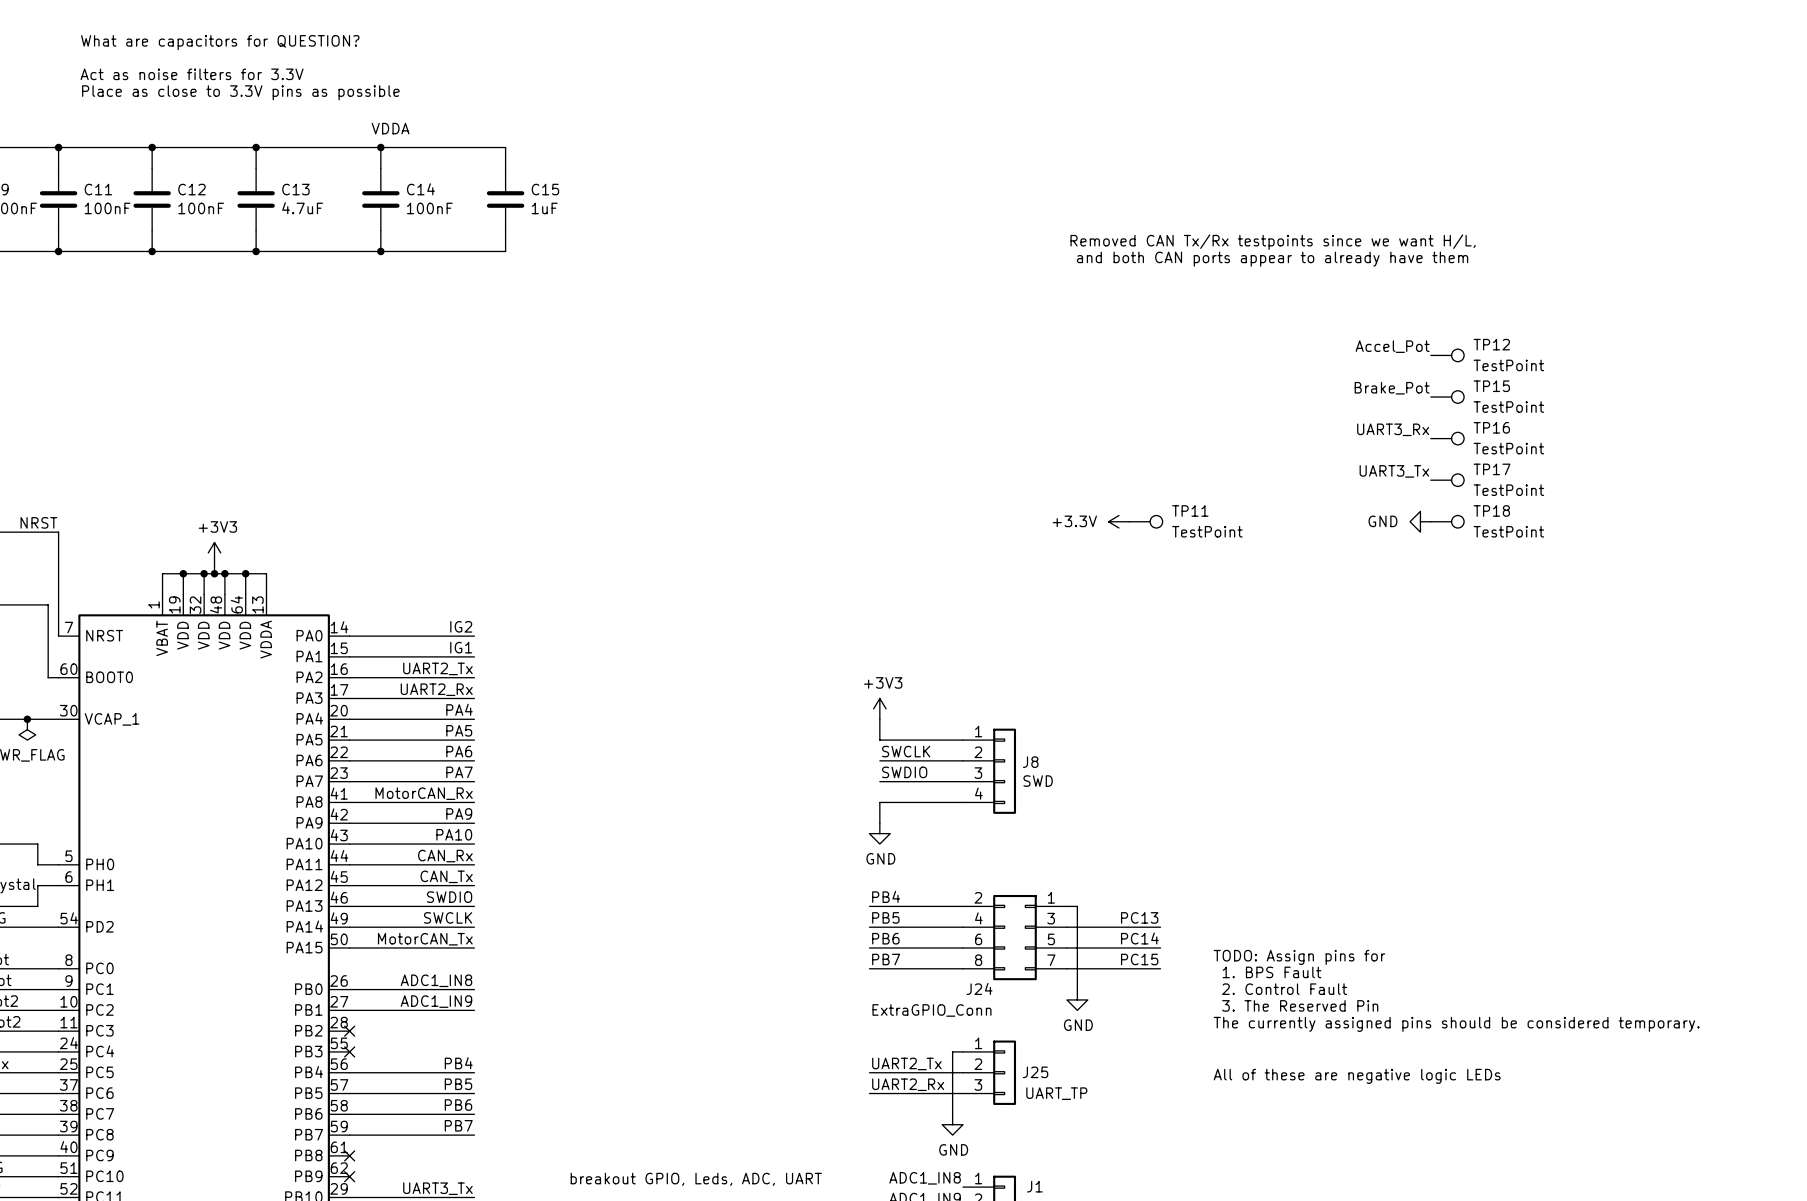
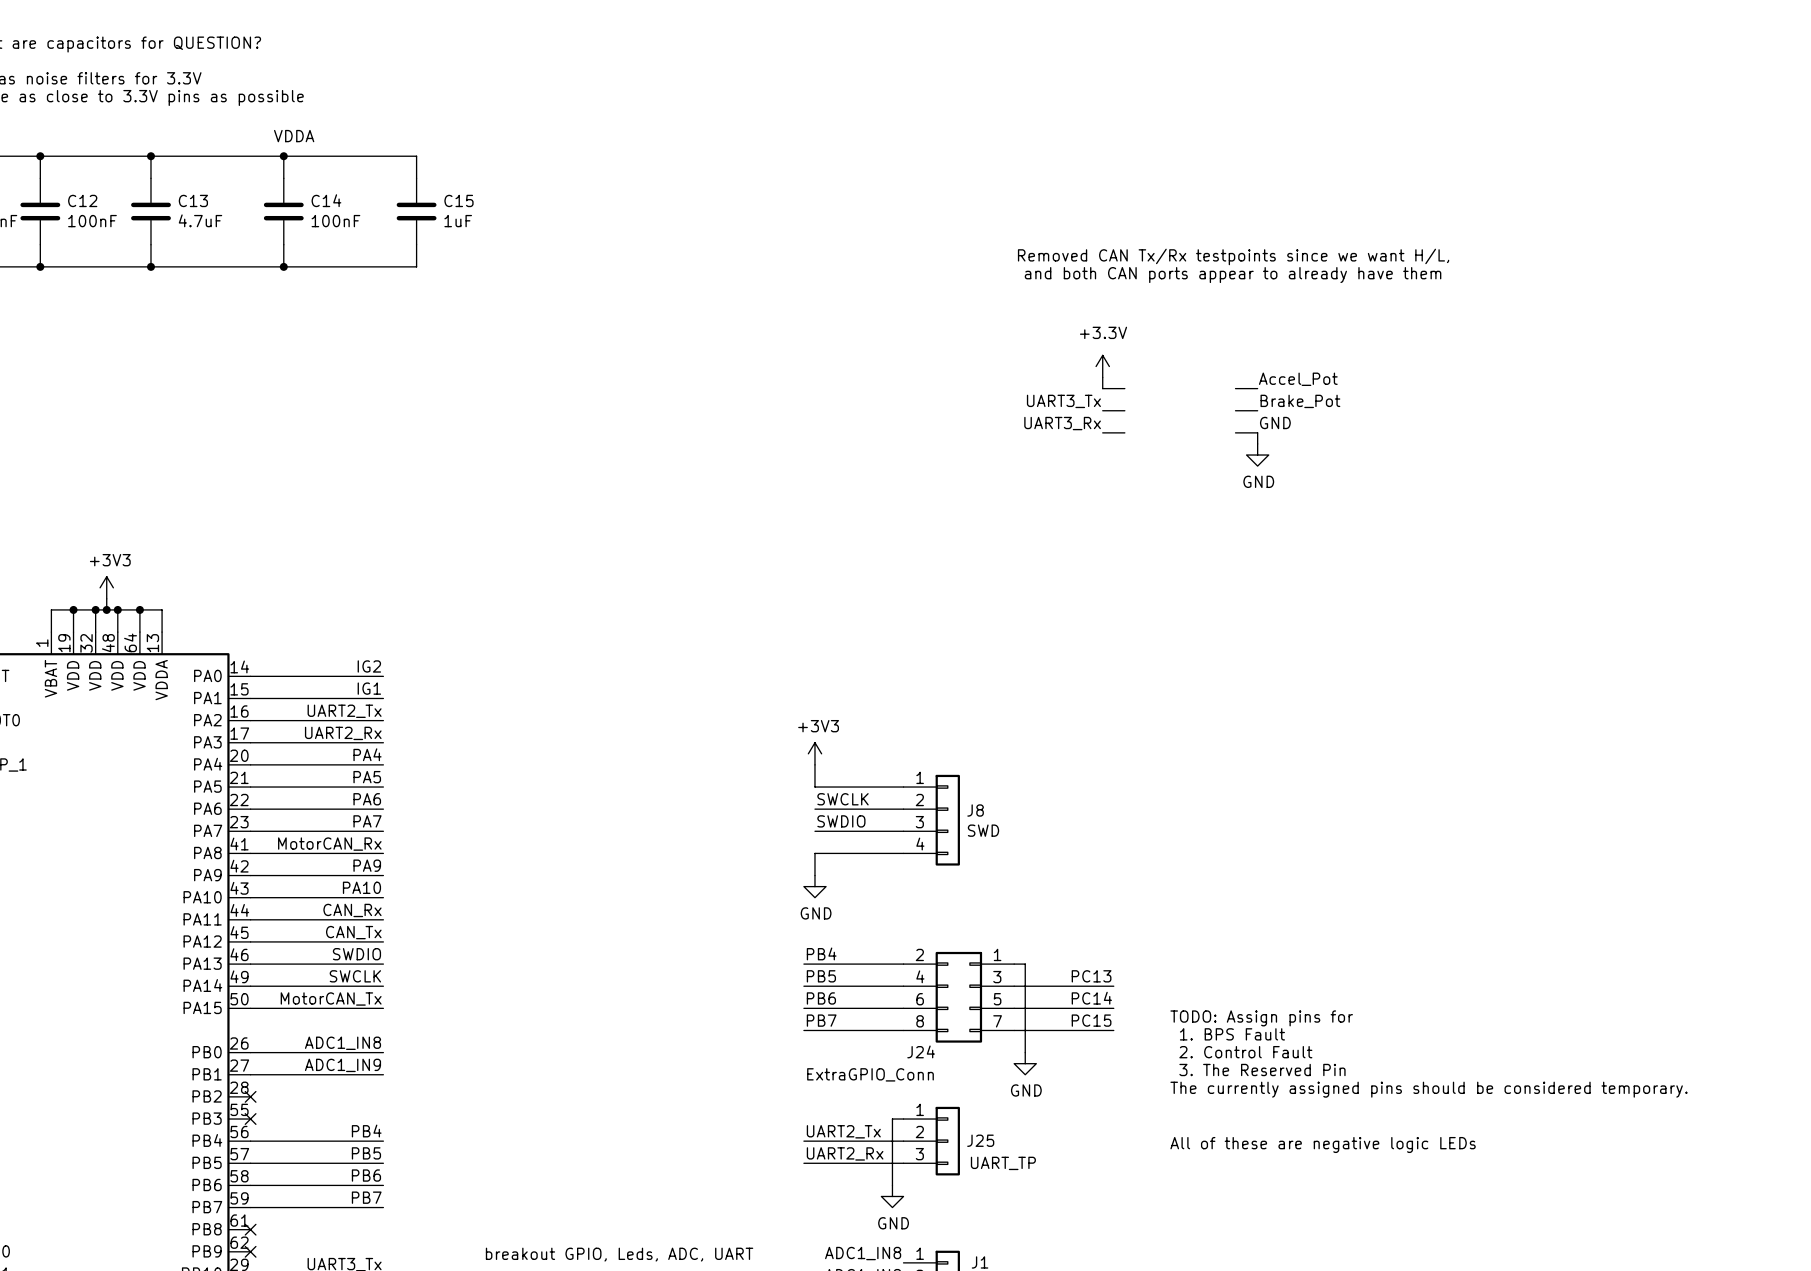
label position: Accel_Pot (1392, 346) -> Accel_Pot (1298, 379)
wire: none -> (1102, 377) (1102, 388) (1124, 388)
TP12: TestPoint (1447, 355) -> none
wire: none -> (1235, 388) (1257, 388)
label: none -> UART3_Tx (1063, 401)
wire: none -> (1102, 410) (1124, 410)
wire: none -> (1235, 410) (1257, 410)
label position: Brake_Pot (1392, 388) -> Brake_Pot (1300, 401)
TP15: TestPoint (1447, 397) -> none
label: none -> UART3_Rx (1062, 423)
label: none -> GND (1275, 423)
wire: none -> (1102, 432) (1124, 432)
wire: none -> (1235, 432) (1257, 432) (1257, 443)
label: UART3_Rx (1393, 429) -> none
TP16: TestPoint (1447, 438) -> none
label: UART3_Tx (1394, 471) -> none
TP17: TestPoint (1447, 480) -> none
power symbol text position: +3.3V (1074, 521) -> +3.3V (1103, 332)
power symbol rotation: 0° (1118, 521) -> 90° clockwise (1102, 366)
power symbol position: +3.3V (1118, 521) -> +3.3V (1102, 366)
TP11: TestPoint (1145, 521) -> none
power symbol rotation: 0° (1420, 521) -> 90° counterclockwise (1257, 455)
power symbol position: GND (1420, 521) -> GND (1257, 455)
TP18: TestPoint (1447, 521) -> none

